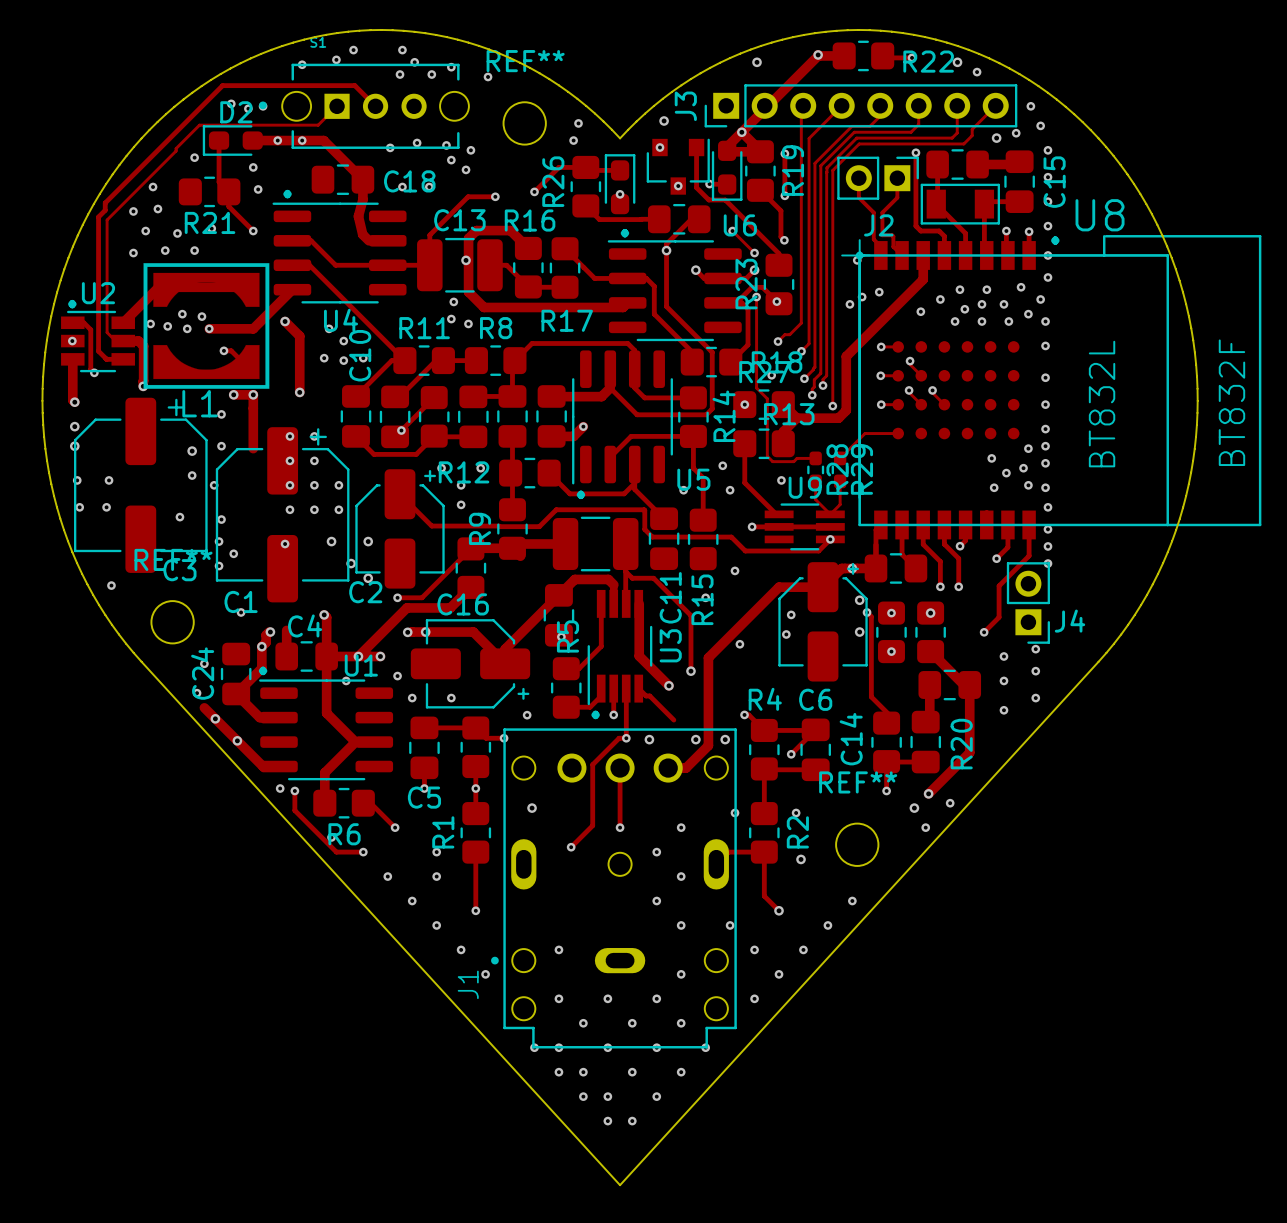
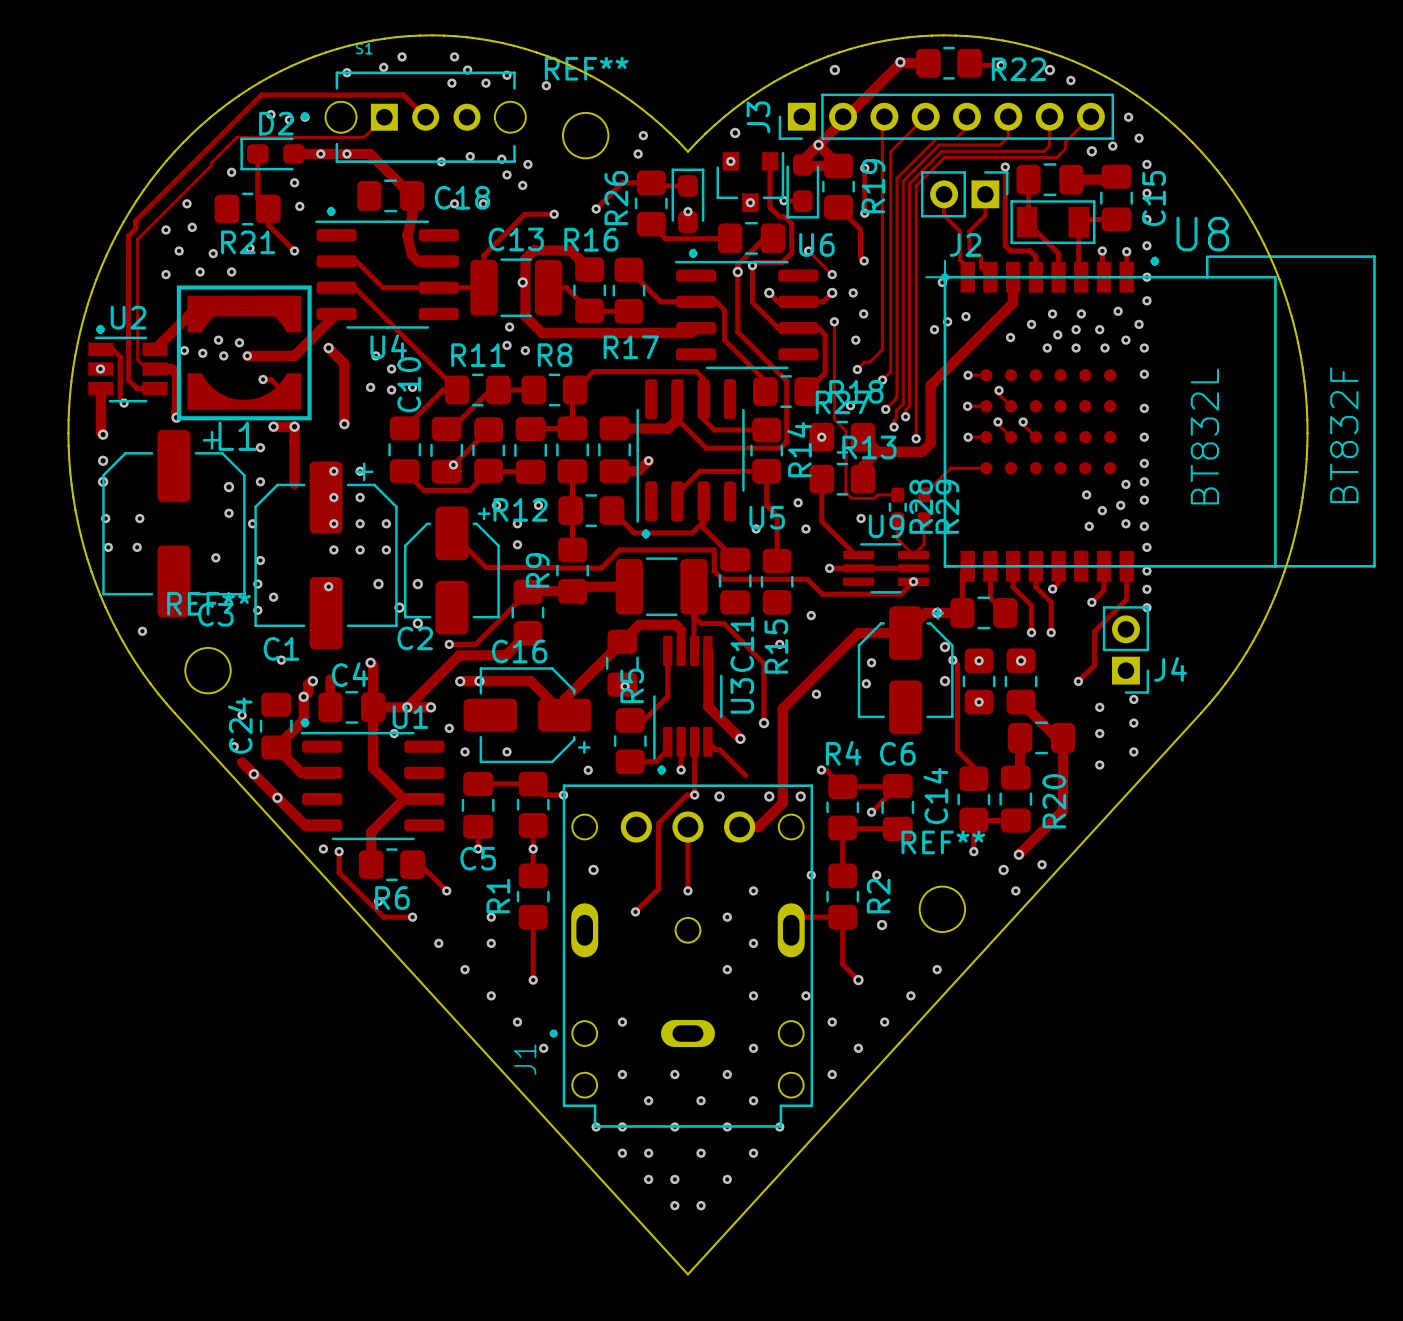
track: (696, 187) (708, 199) (725, 199) (779, 253) (779, 265) -> (770, 204) (770, 207) (779, 216) (784, 216) (791, 223) (791, 253) (782, 262) (755, 262) (752, 265)
track: none -> (752, 265) (752, 302) (778, 328) (798, 328)
via: none -> (752, 265)
via: none -> (853, 292)
R23: (779, 284) -> none
via: none -> (863, 313)
via: (776, 301) -> none
track: (736, 302) (751, 287) (762, 287) (779, 303) -> none
via: none -> (855, 340)

